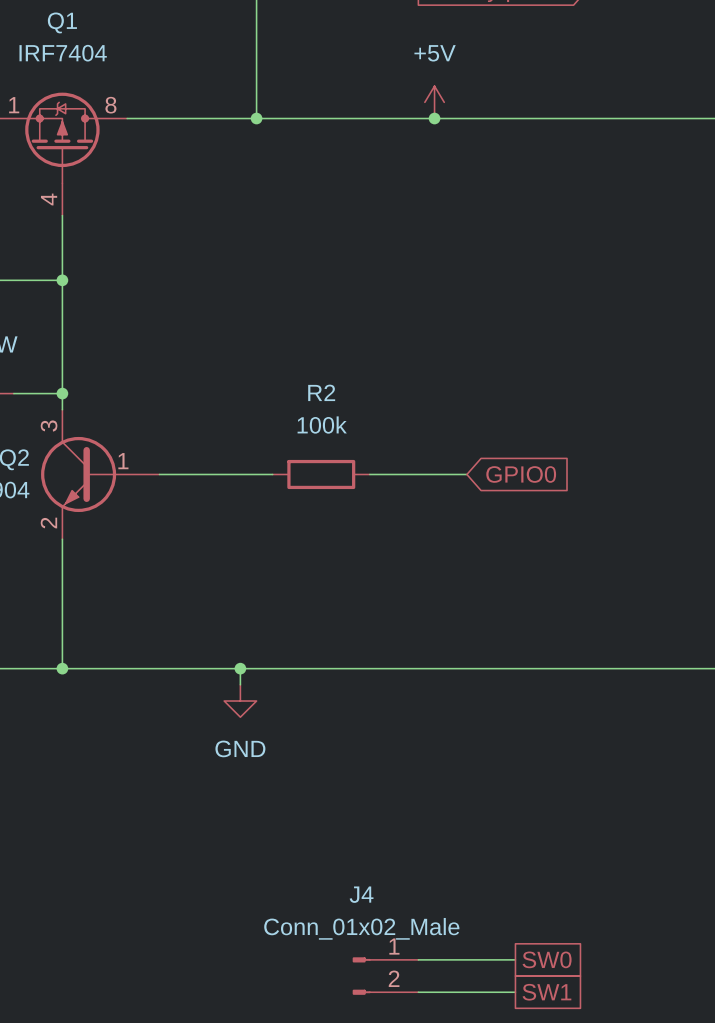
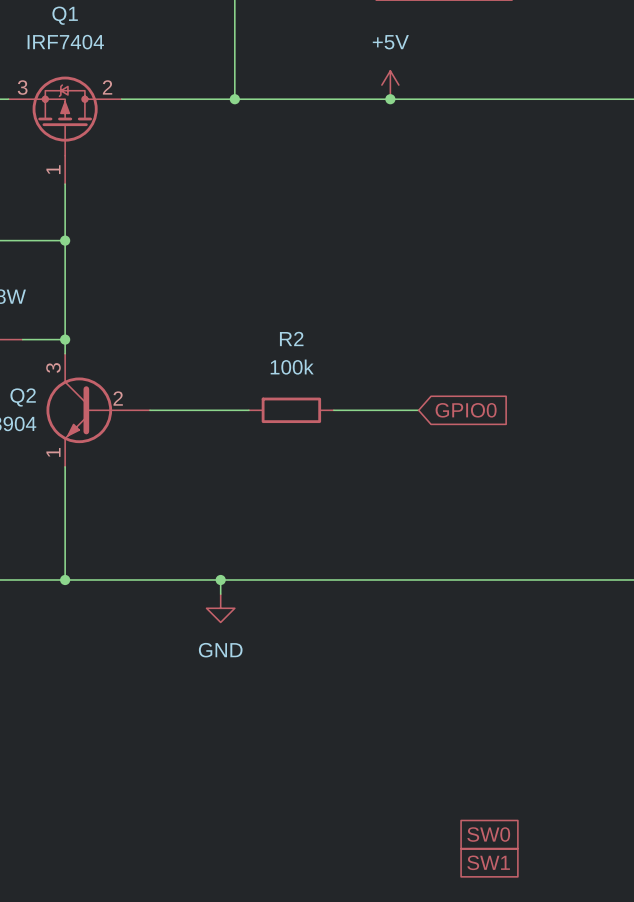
Q1 pin number: 1 (14, 105) -> 3 (22, 87)
Q1 pin number: 8 (110, 105) -> 2 (107, 87)
Q1 pin number: 4 (49, 199) -> 1 (53, 169)
Q2 pin number: 1 (123, 461) -> 2 (118, 398)
Q2 pin number: 2 (48, 523) -> 1 (53, 452)
wire: (418, 959) (515, 959) -> none
J4: Conn_01x02_Male (385, 976) -> none
wire: (418, 992) (515, 992) -> none

